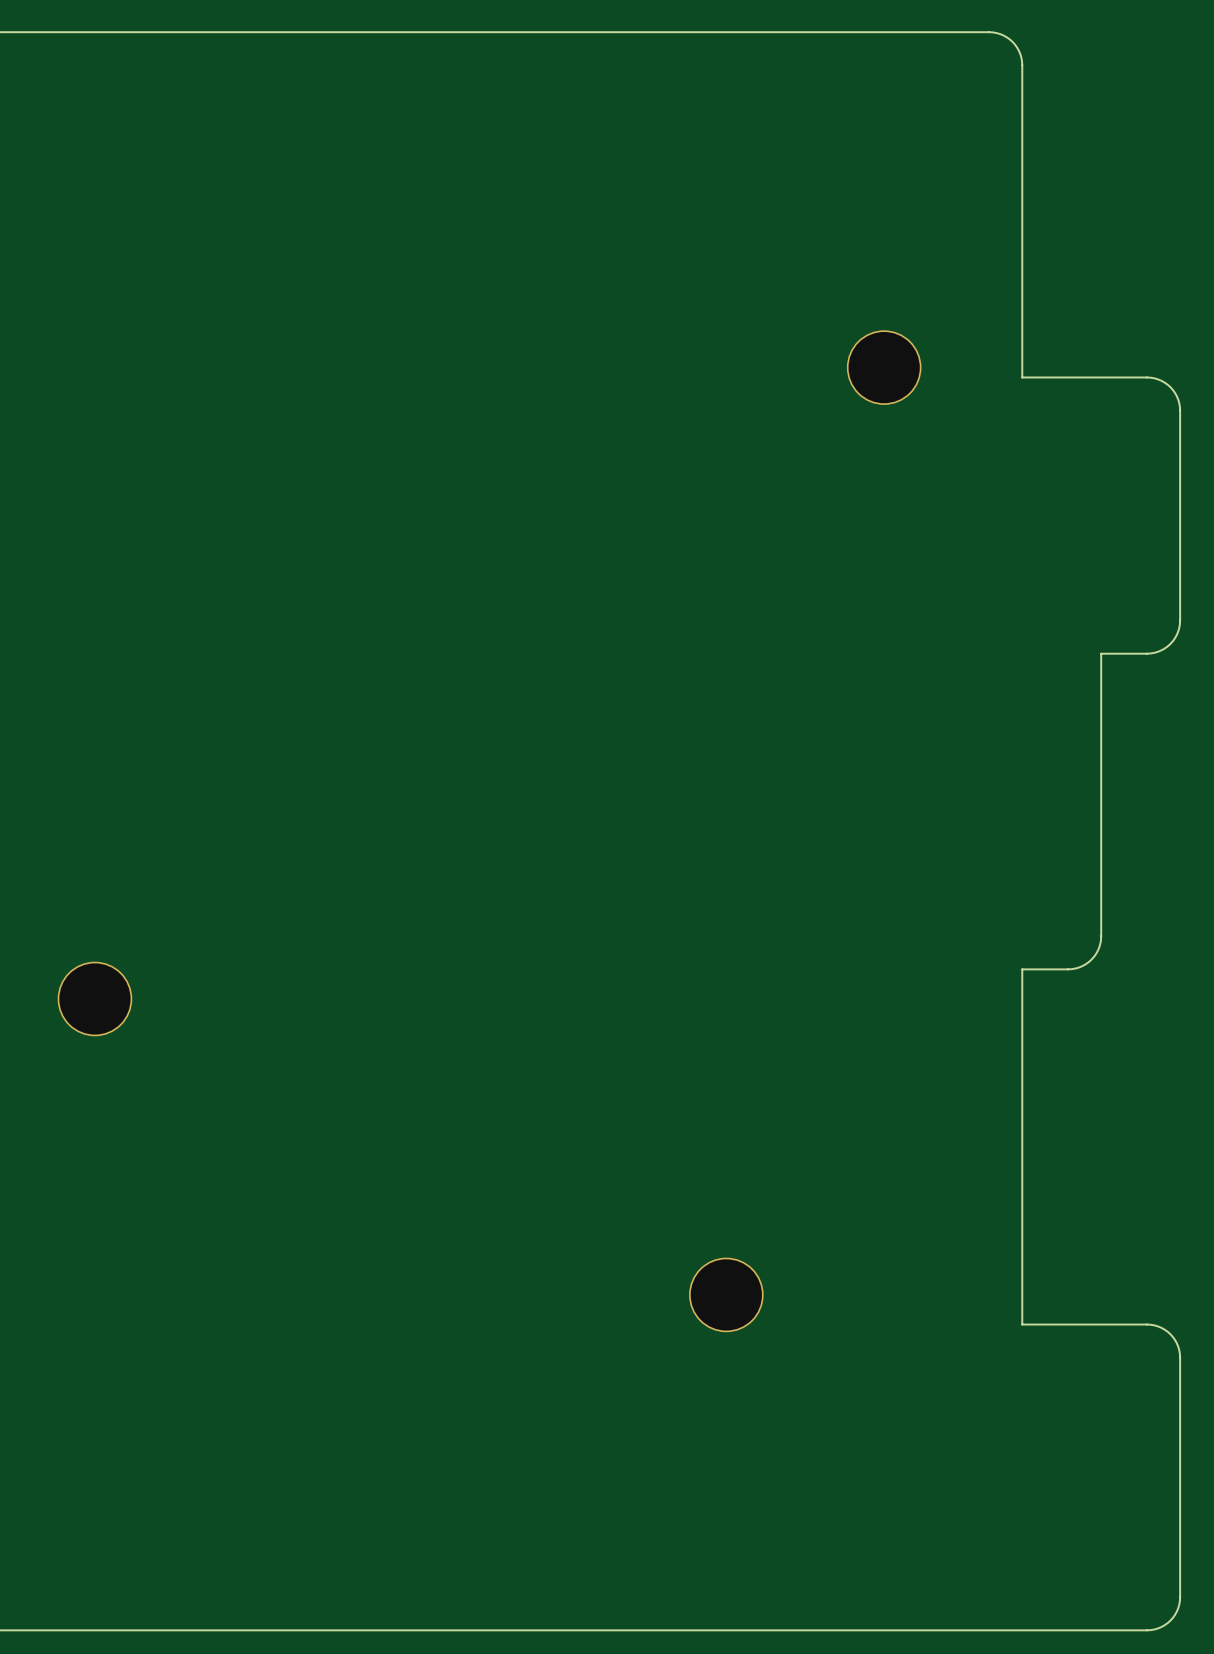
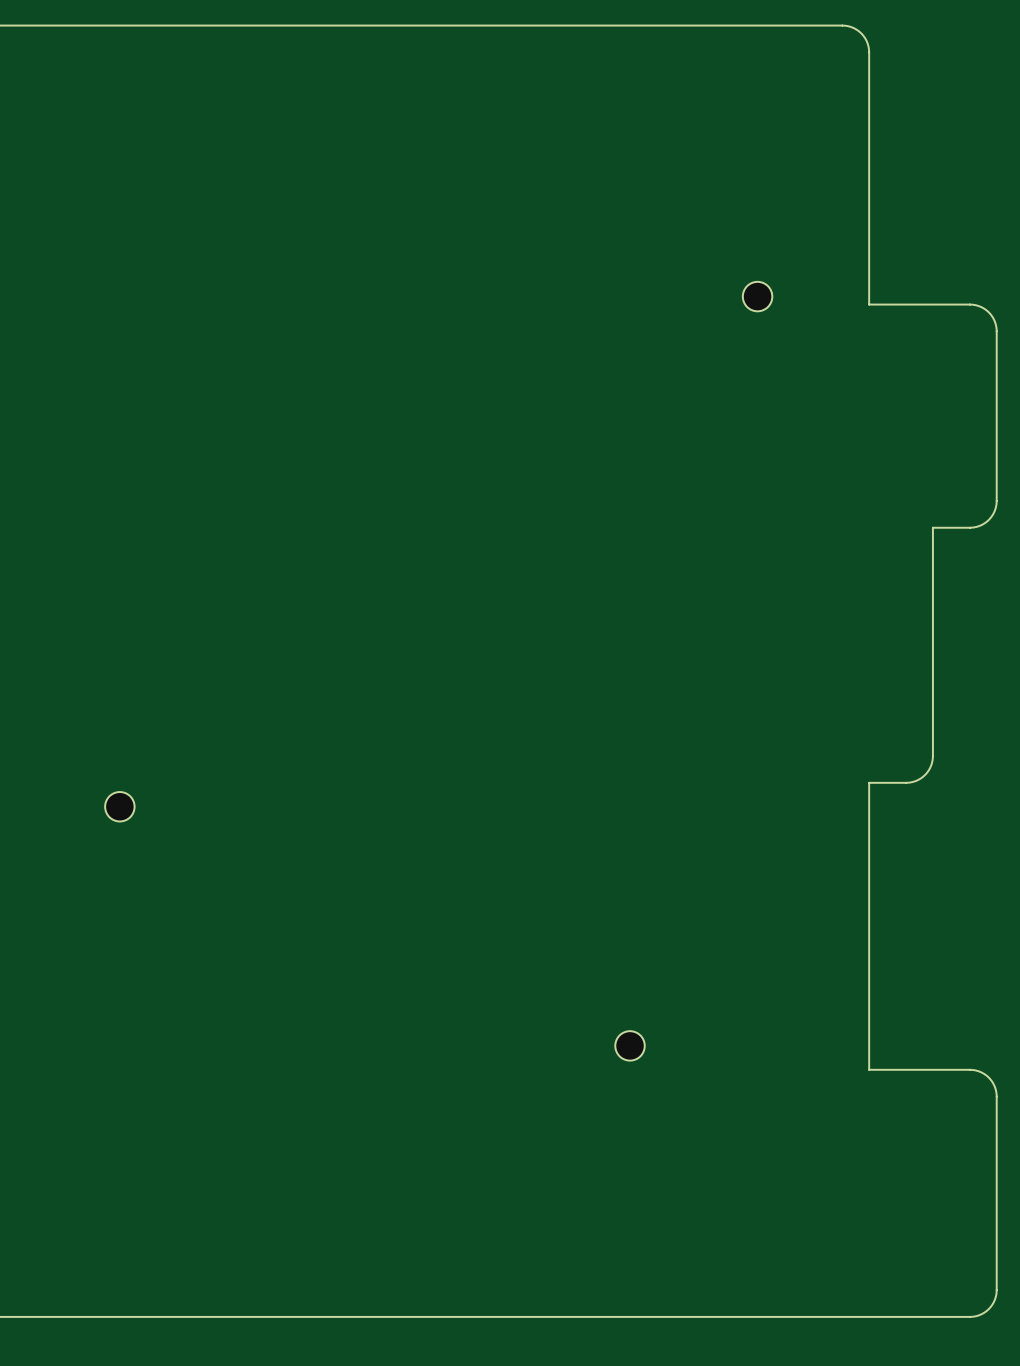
part footprint: [846, 330, 922, 405] -> [742, 281, 773, 312]
part footprint: [57, 961, 133, 1037] -> [105, 792, 135, 822]
part footprint: [689, 1257, 764, 1333] -> [615, 1031, 645, 1061]

